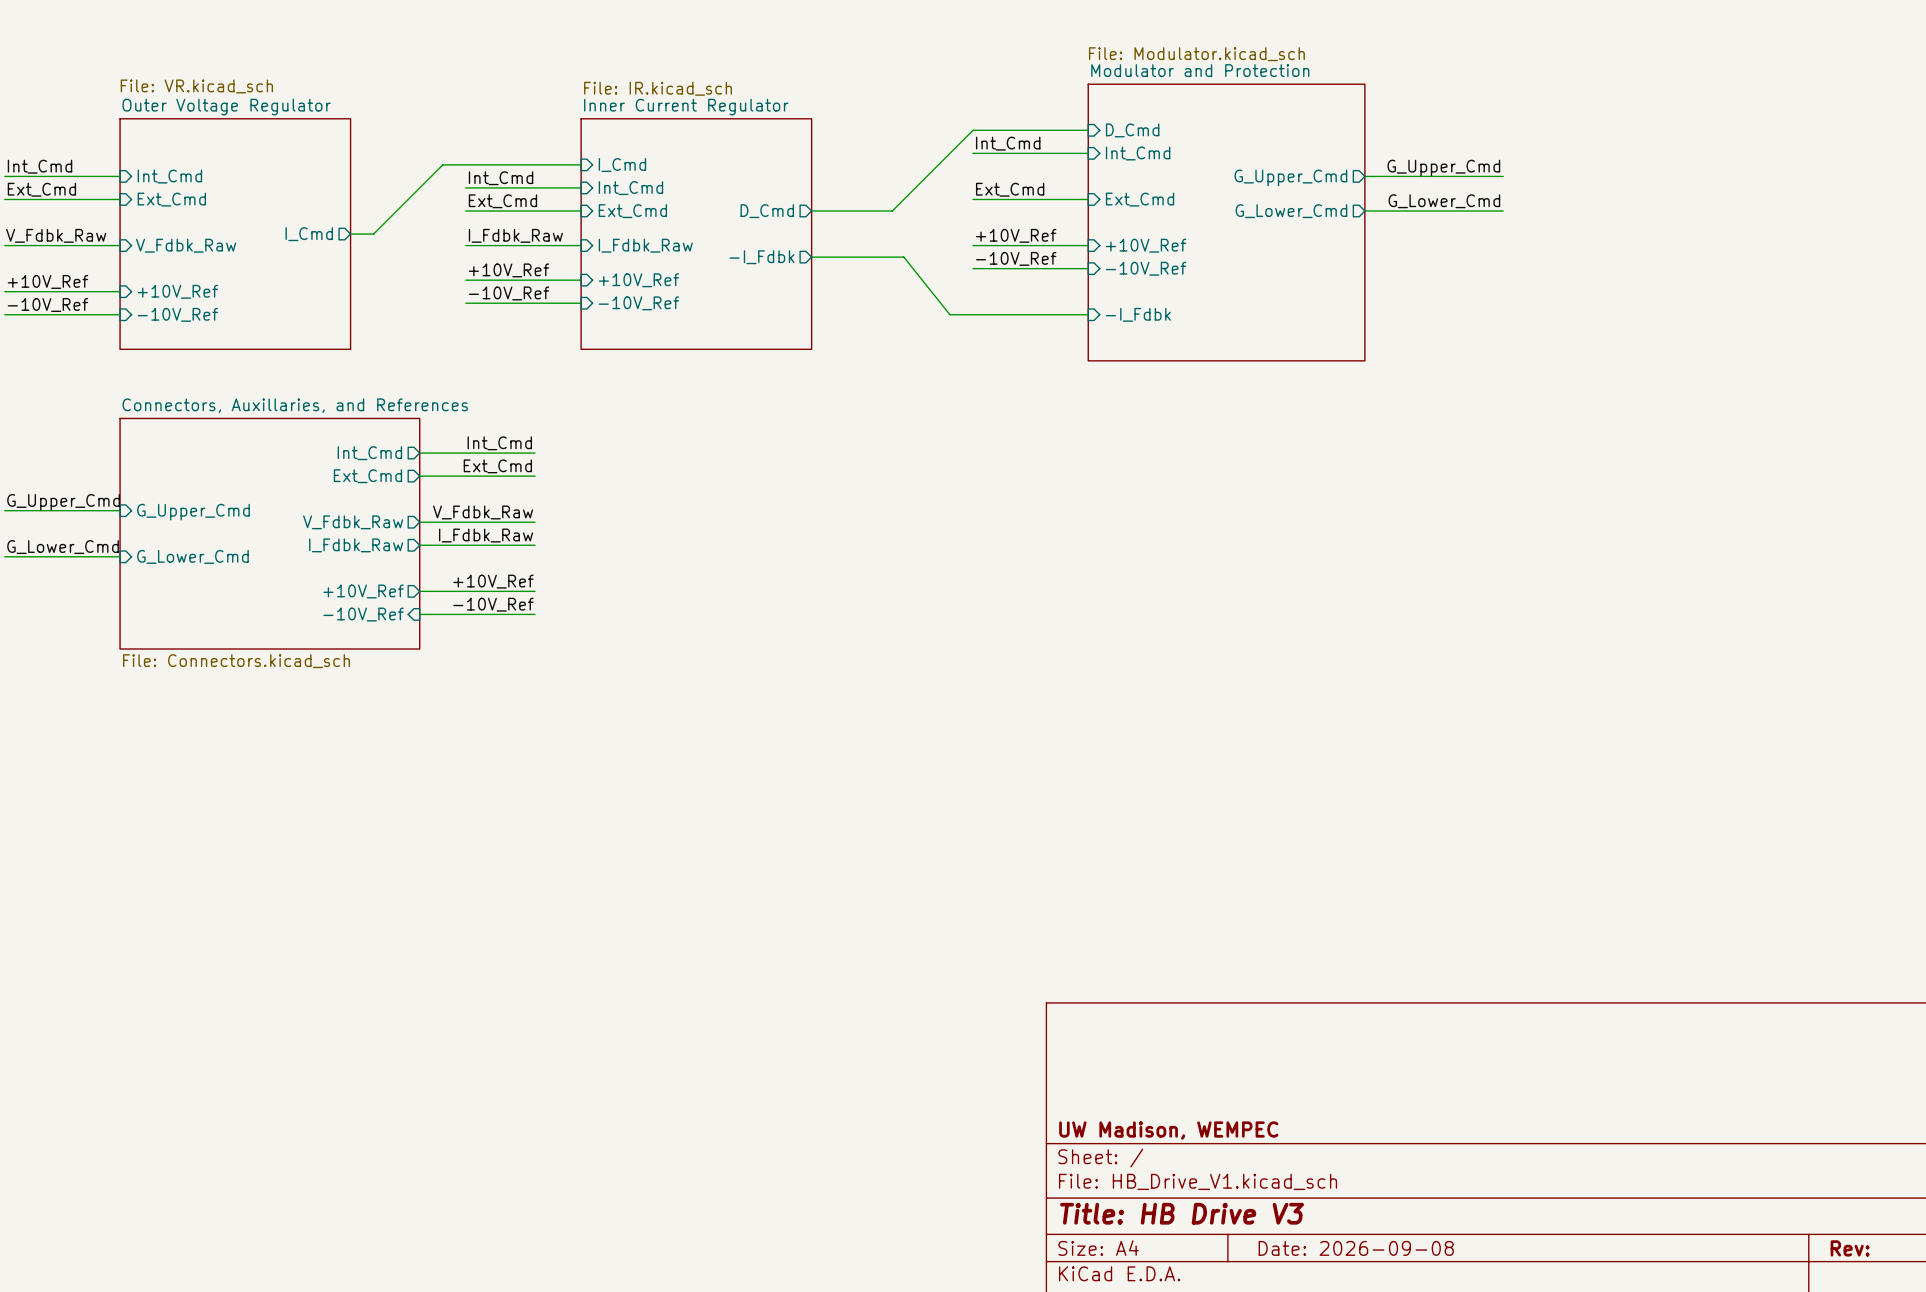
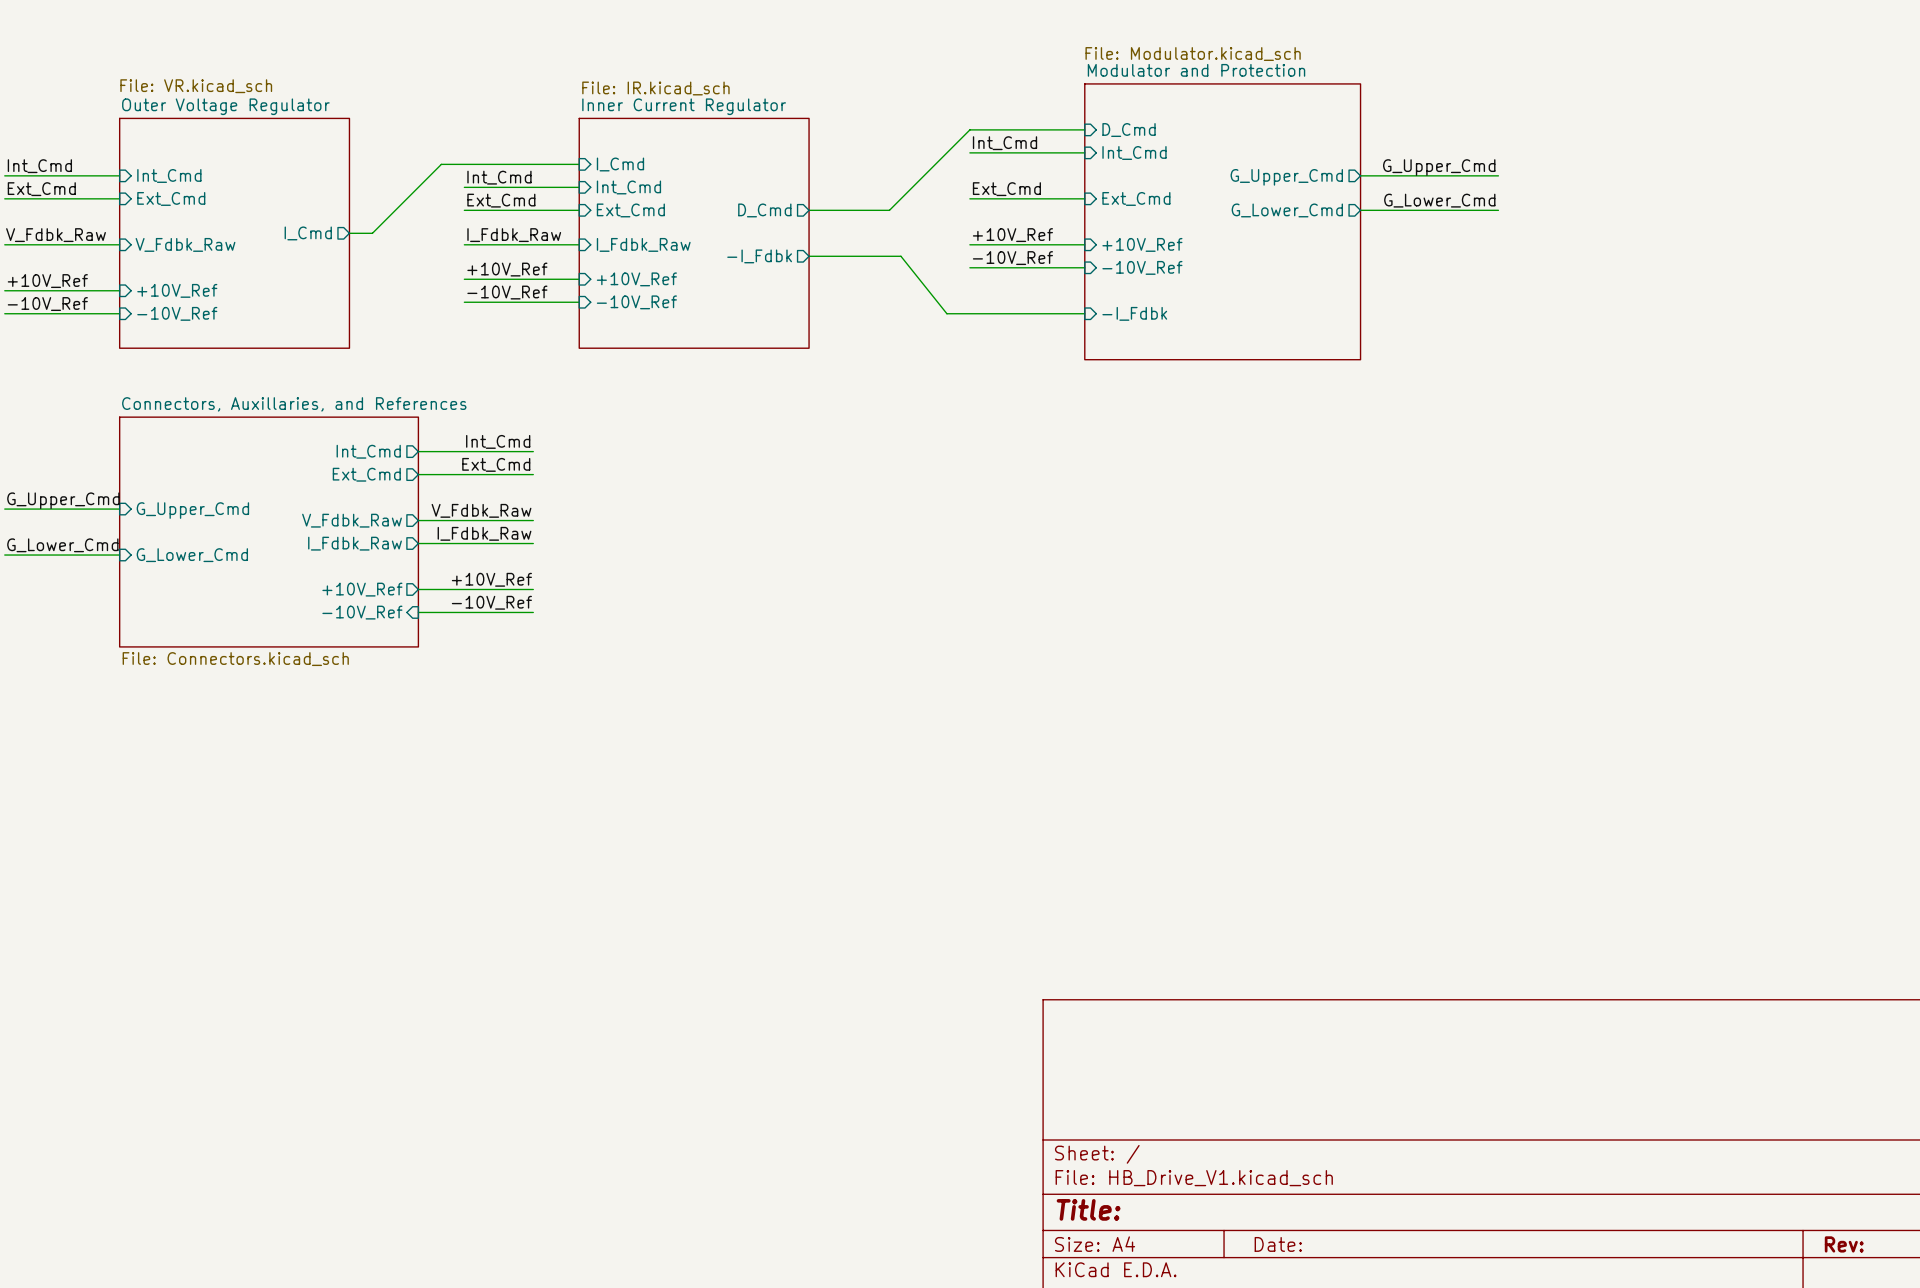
title block: UW Madison, WEMPEC (1168, 1130) -> none
title block: Title: HB Drive V3 (1182, 1213) -> Title: (1088, 1209)
title block: Date: 2026-09-08 (1356, 1248) -> Date: (1278, 1244)

